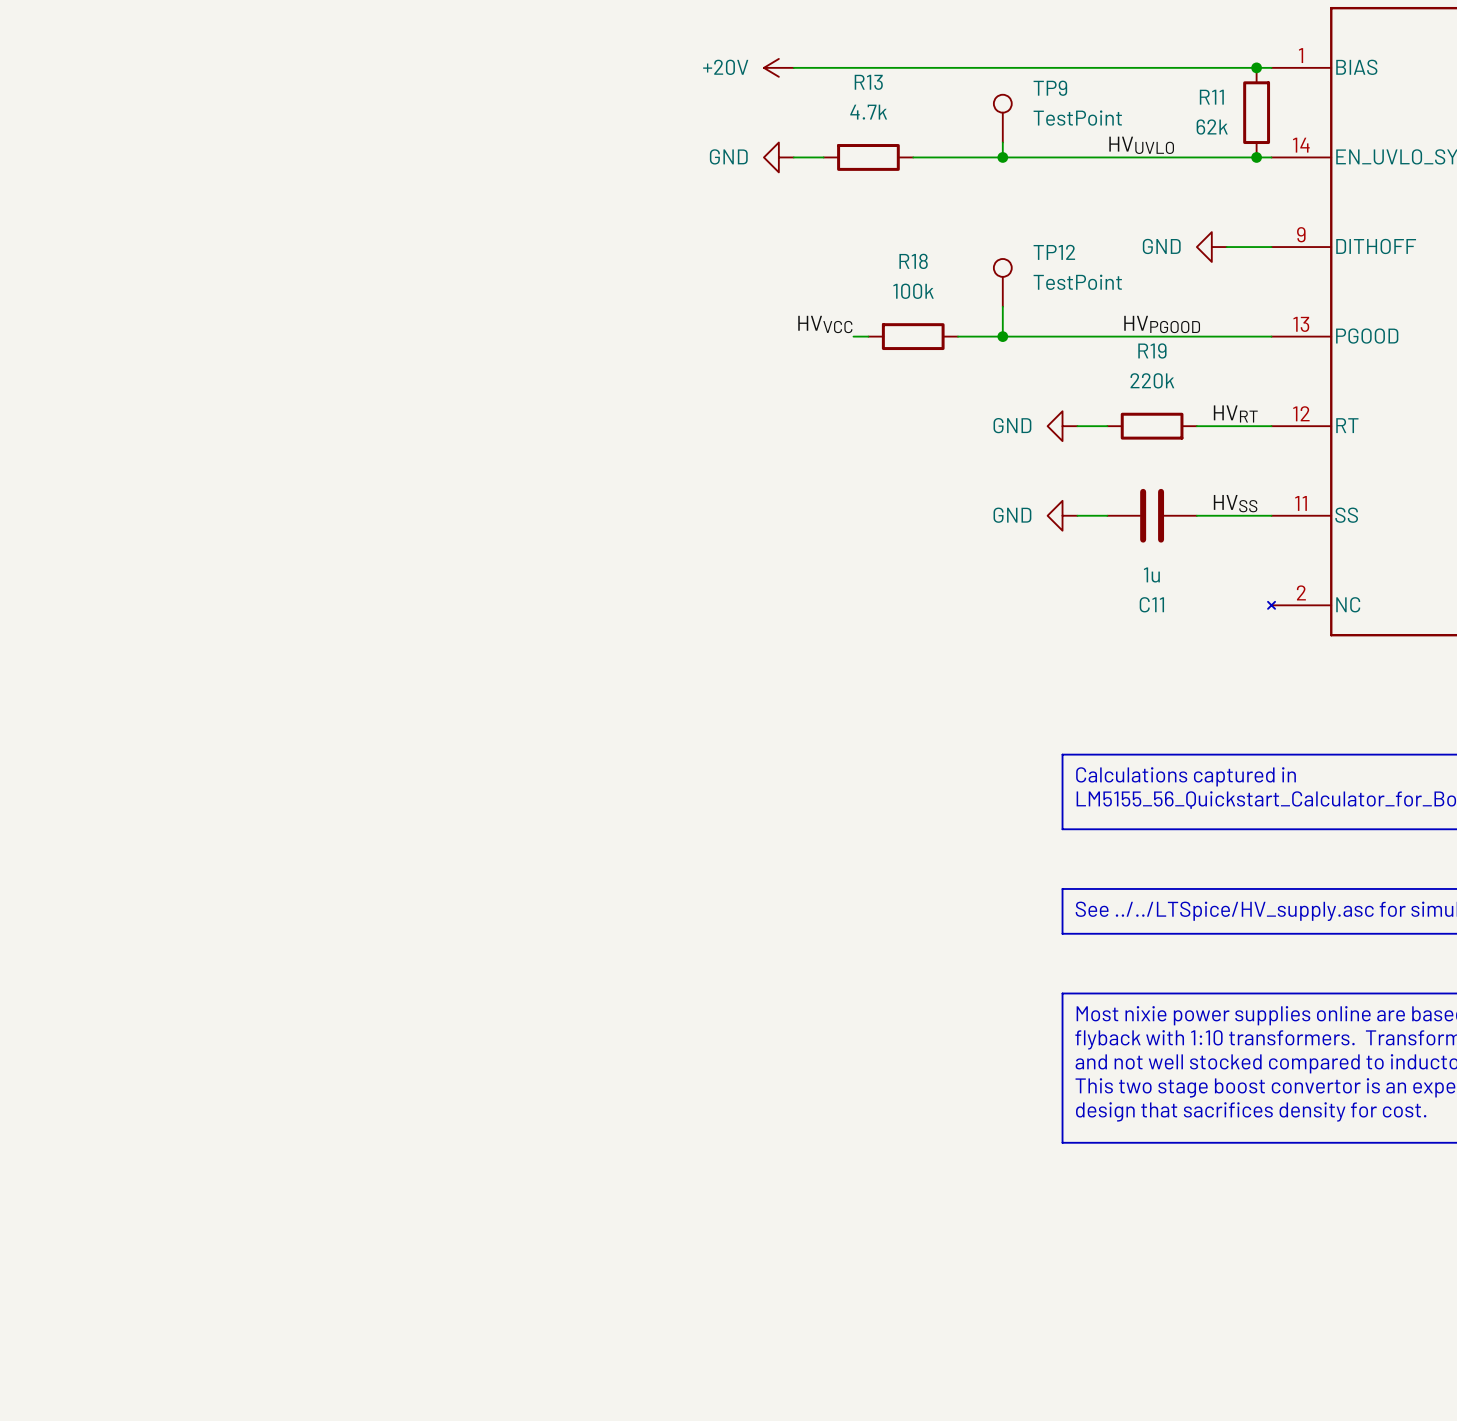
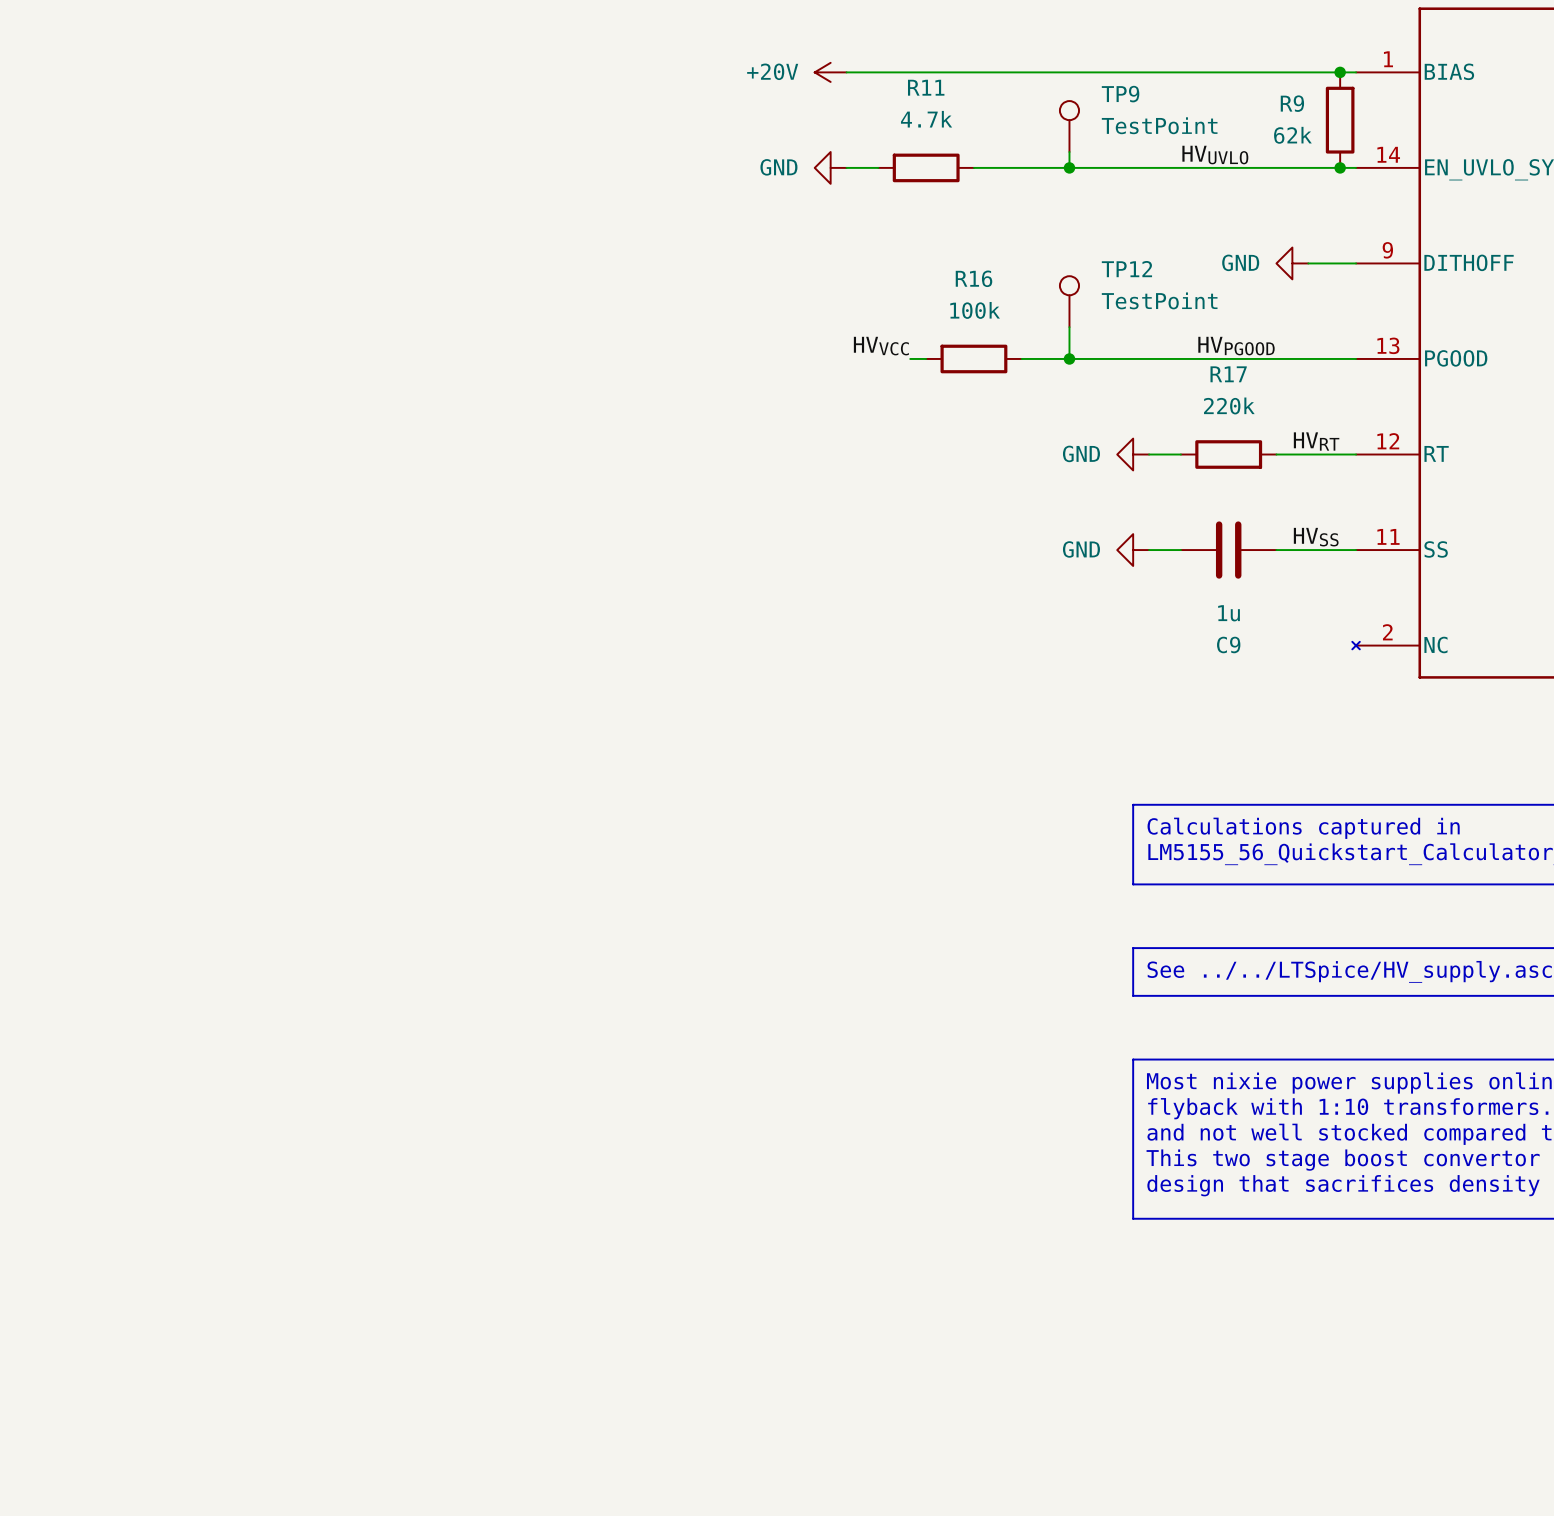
R13 name: R13 (868, 82) -> R11 (926, 87)
R11 name: R11 (1211, 97) -> R9 (1292, 103)
R18 name: R18 (913, 261) -> R16 (974, 278)
R19 name: R19 (1152, 350) -> R17 (1228, 374)
C11 name: C11 (1151, 604) -> C9 (1228, 644)

